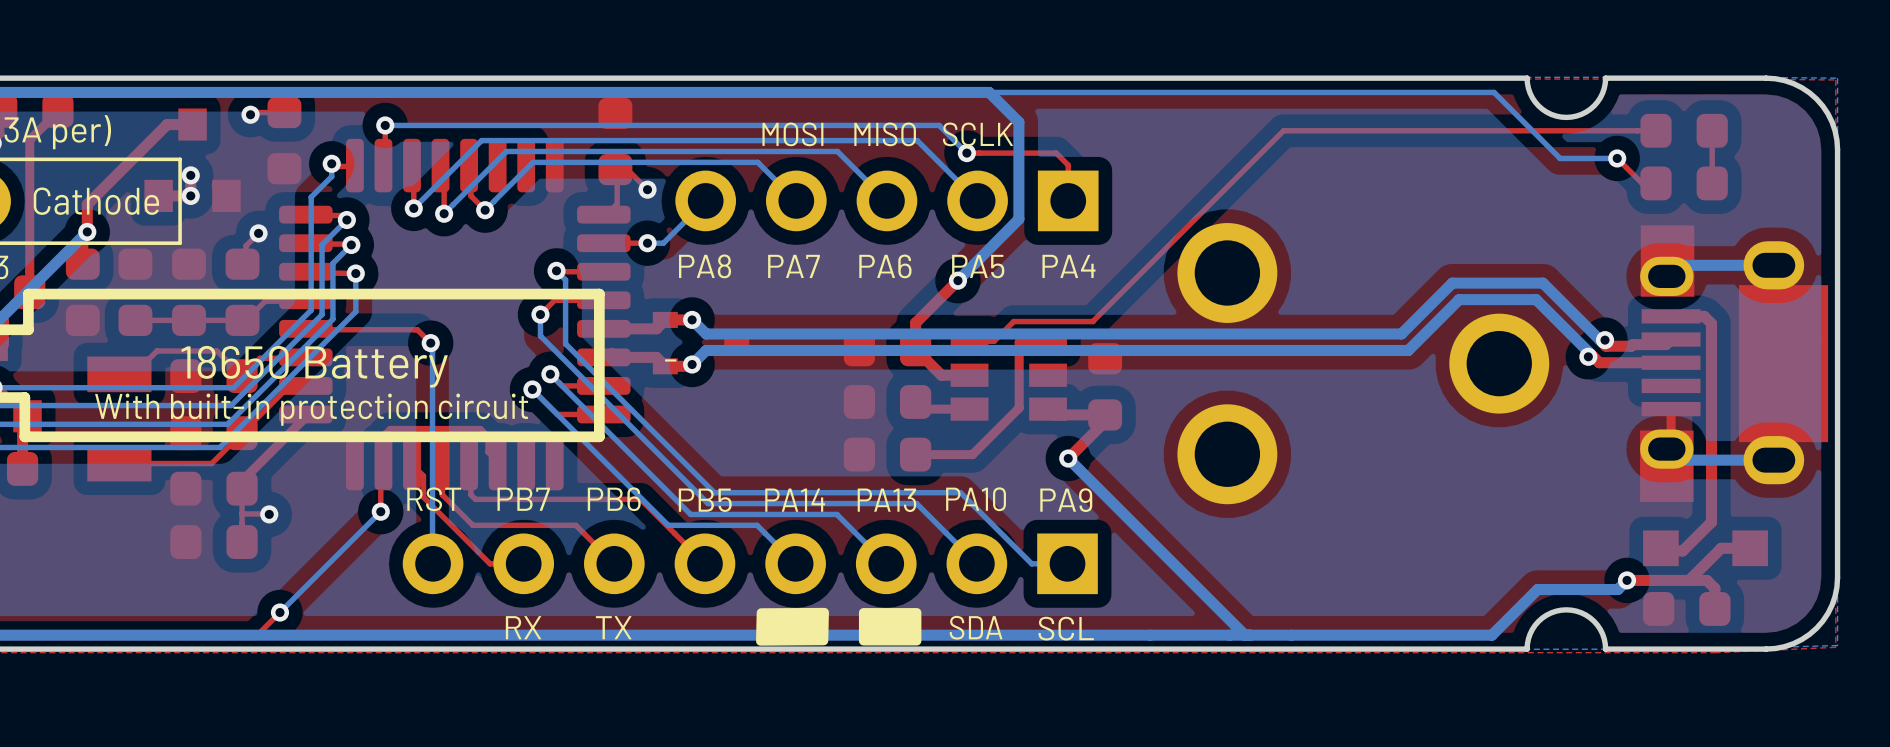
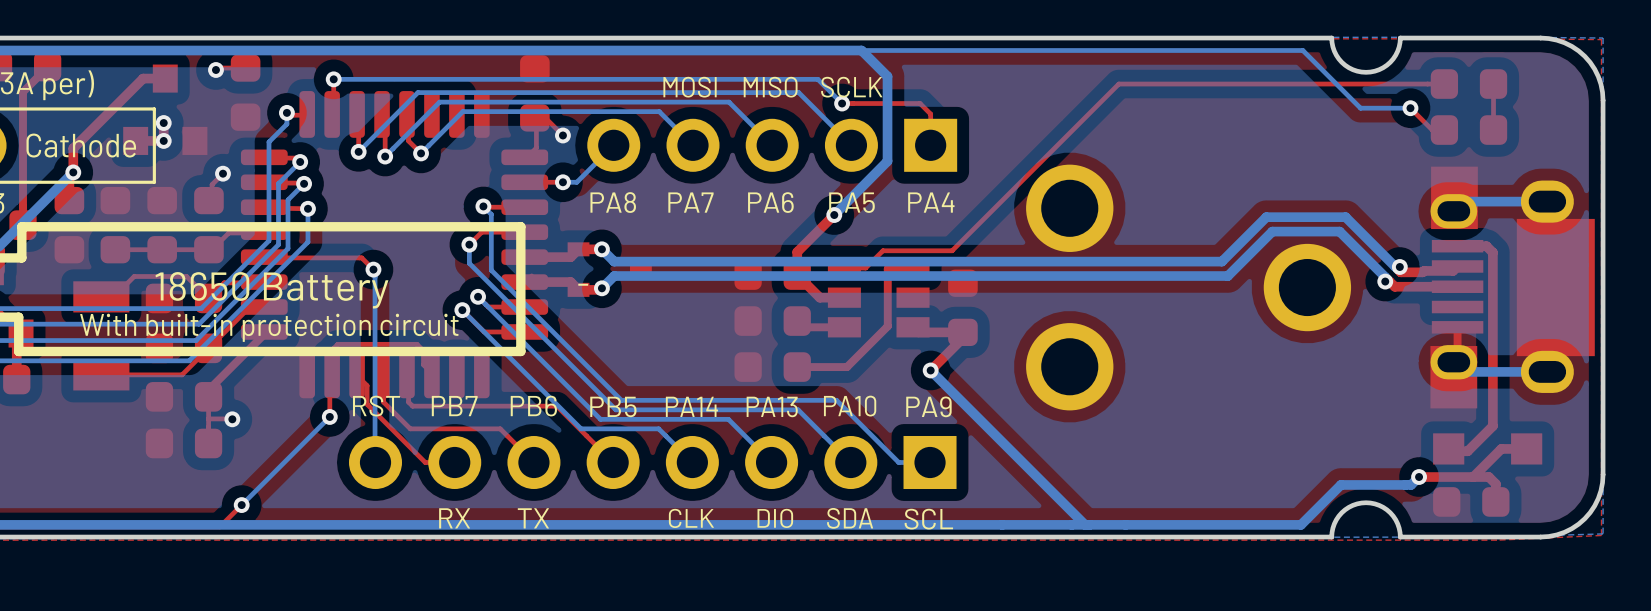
drawing: [756, 607, 922, 646] -> none
text: none -> CLK (691, 518)
text: none -> DIO (775, 518)

